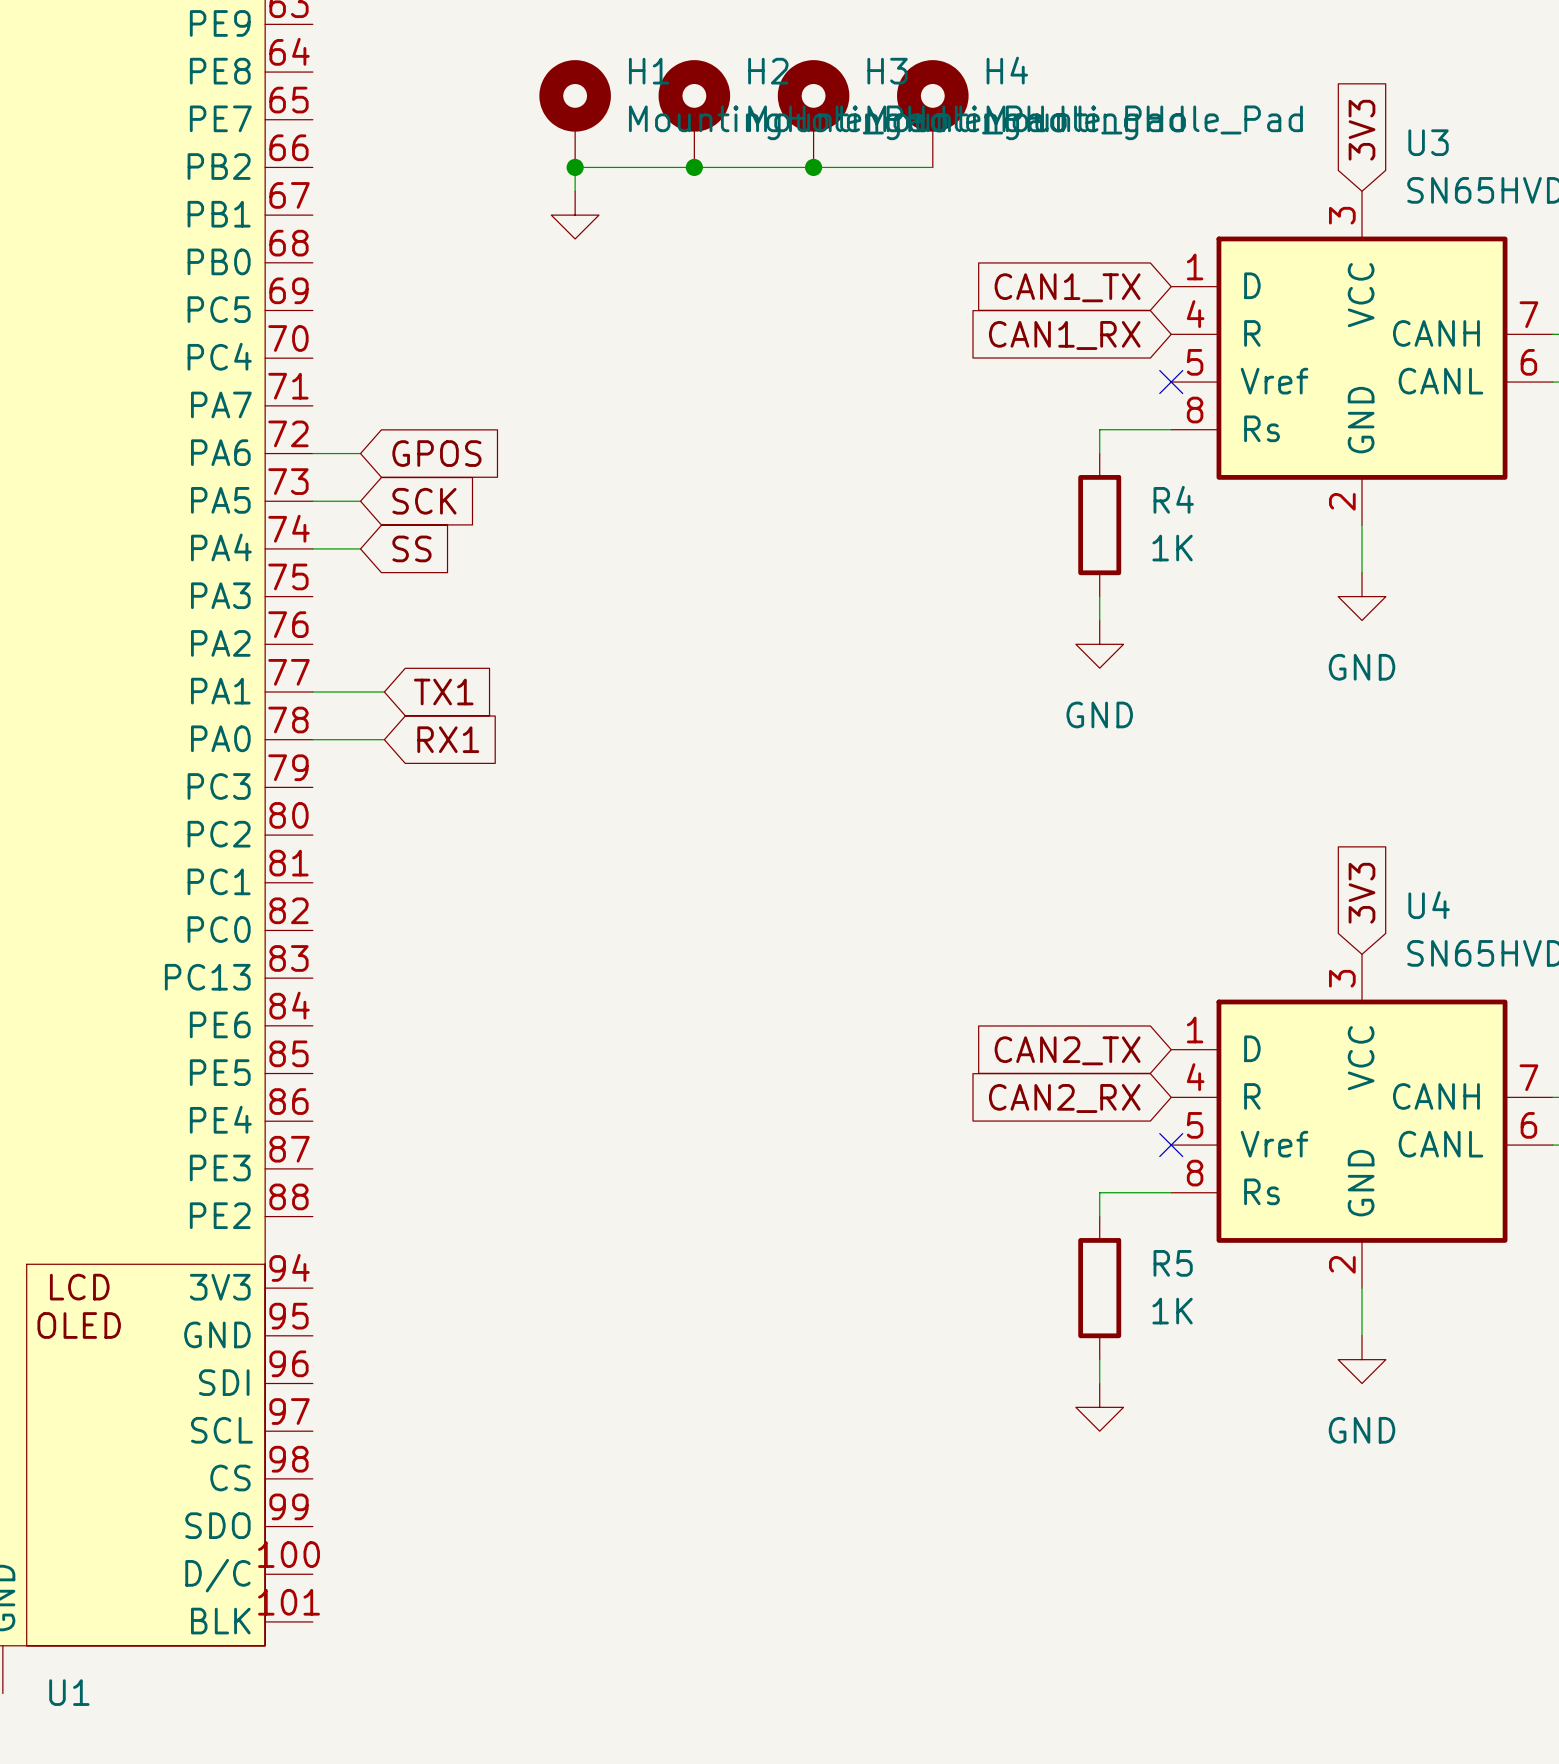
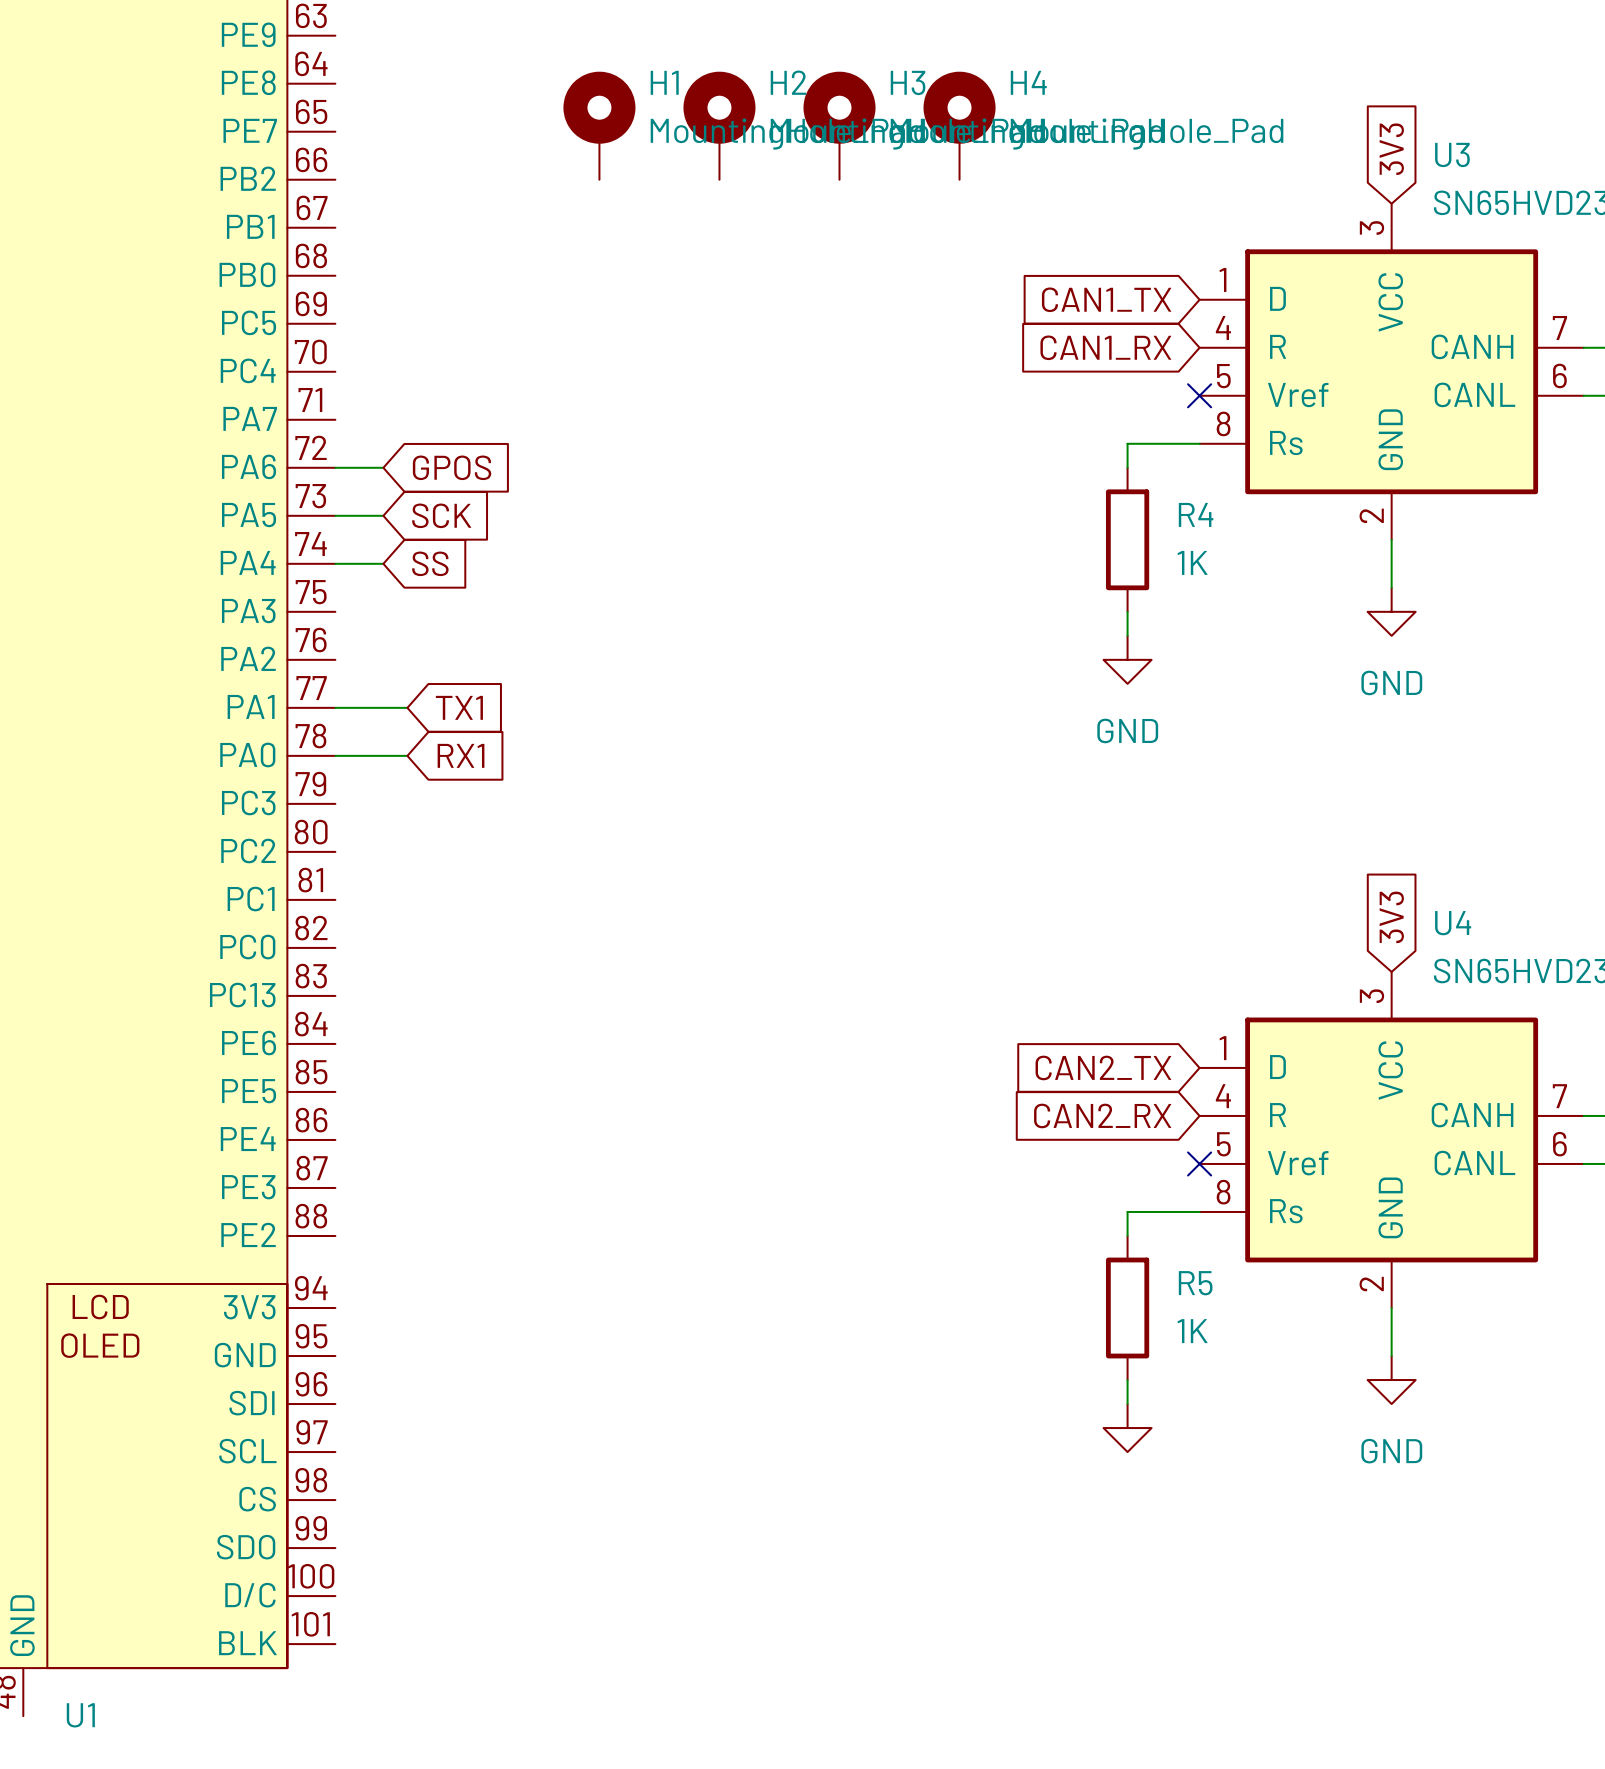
junction: (575, 167) -> none
junction: (694, 167) -> none
junction: (813, 167) -> none
wire: (932, 167) (575, 167) (575, 191) -> none
power symbol: (575, 215) -> none

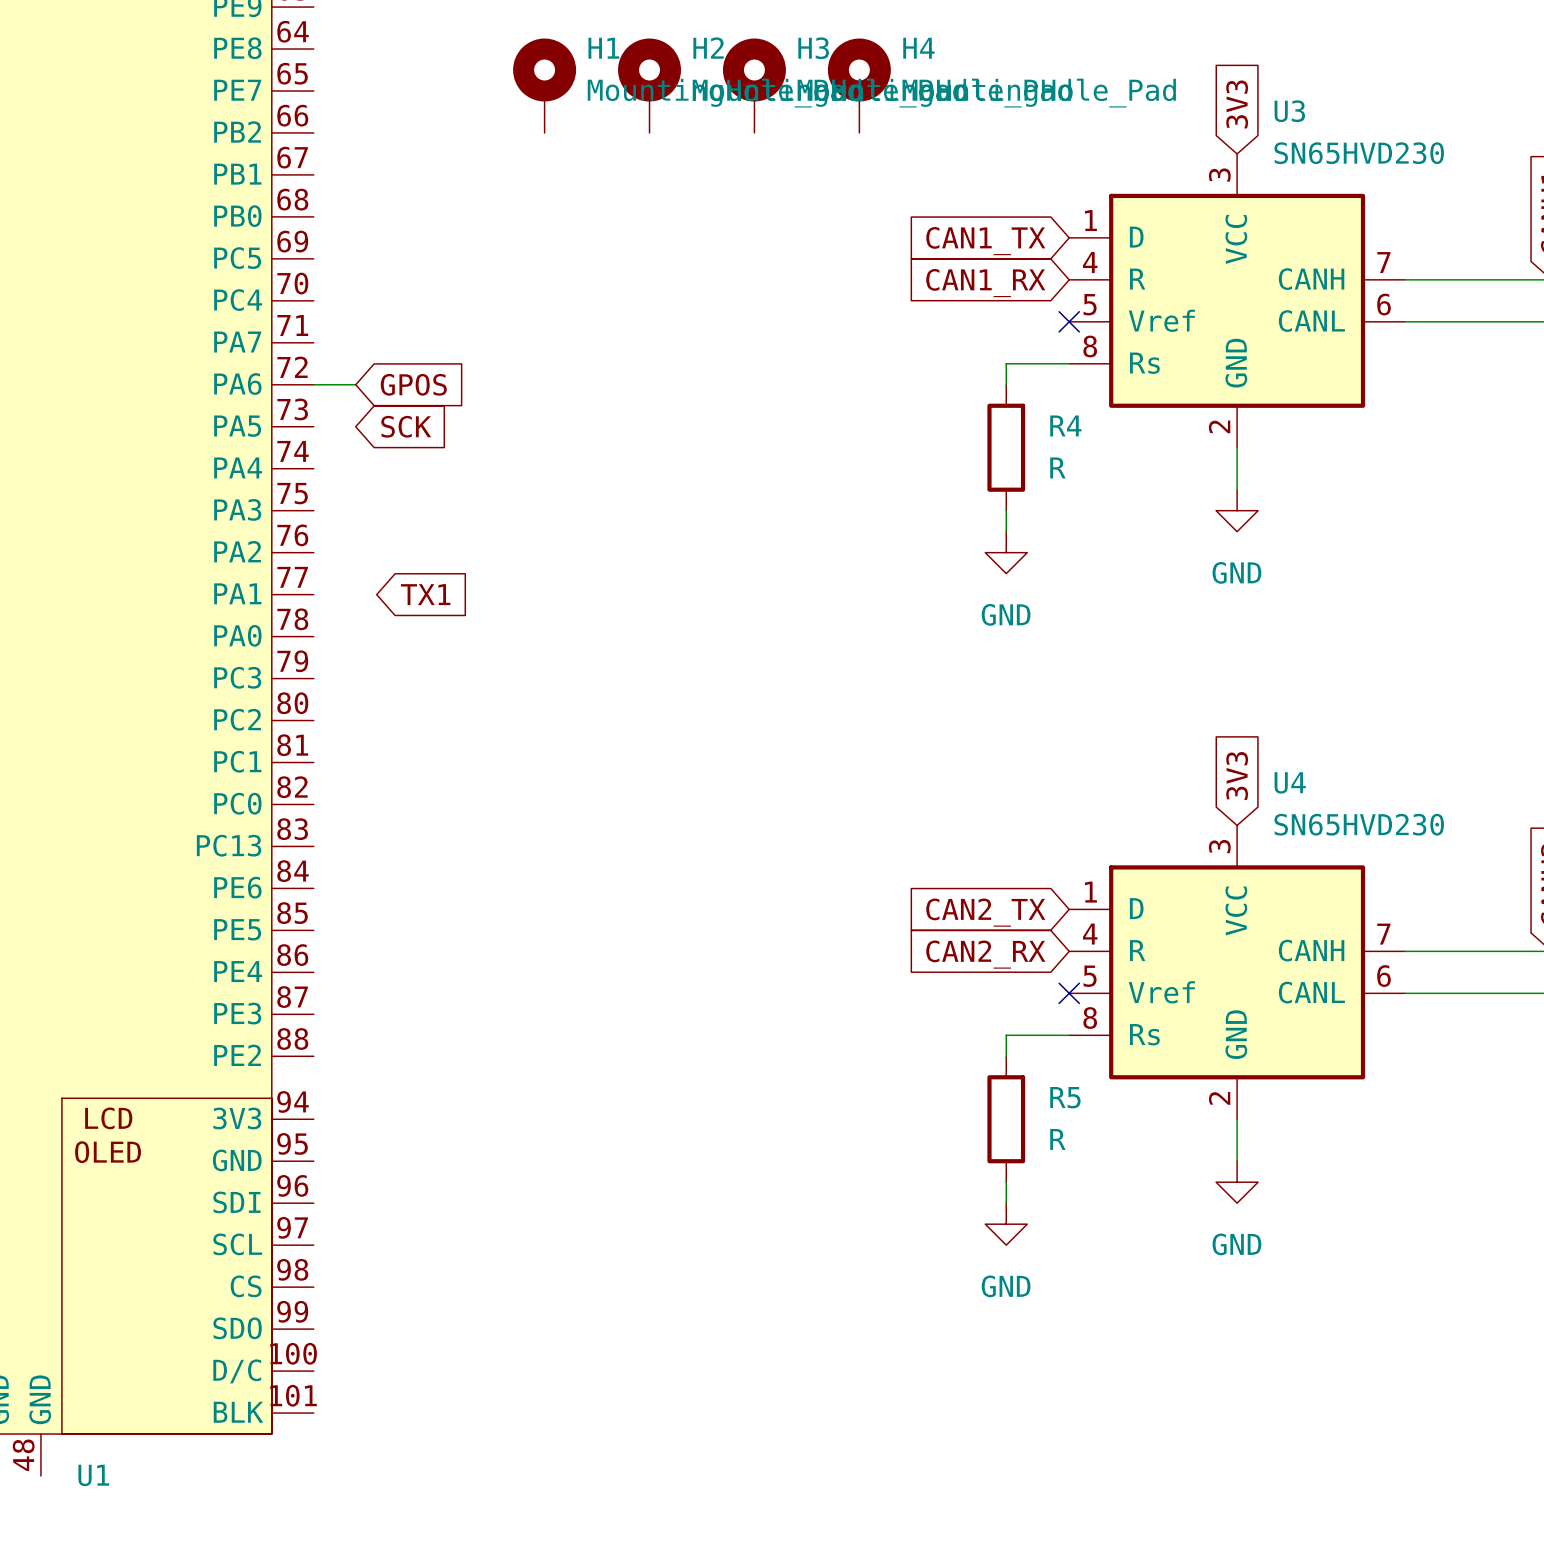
wire: (335, 515) (383, 515) -> none
R4 value: 1K (1192, 562) -> R (1057, 467)
wire: (335, 563) (383, 563) -> none
global label: SS (430, 563) -> none
wire: (335, 707) (407, 707) -> none
wire: (335, 755) (407, 755) -> none
global label: RX1 (461, 755) -> none
R5 value: 1K (1192, 1331) -> R (1057, 1139)
power symbol text: none -> GND (1006, 1286)

